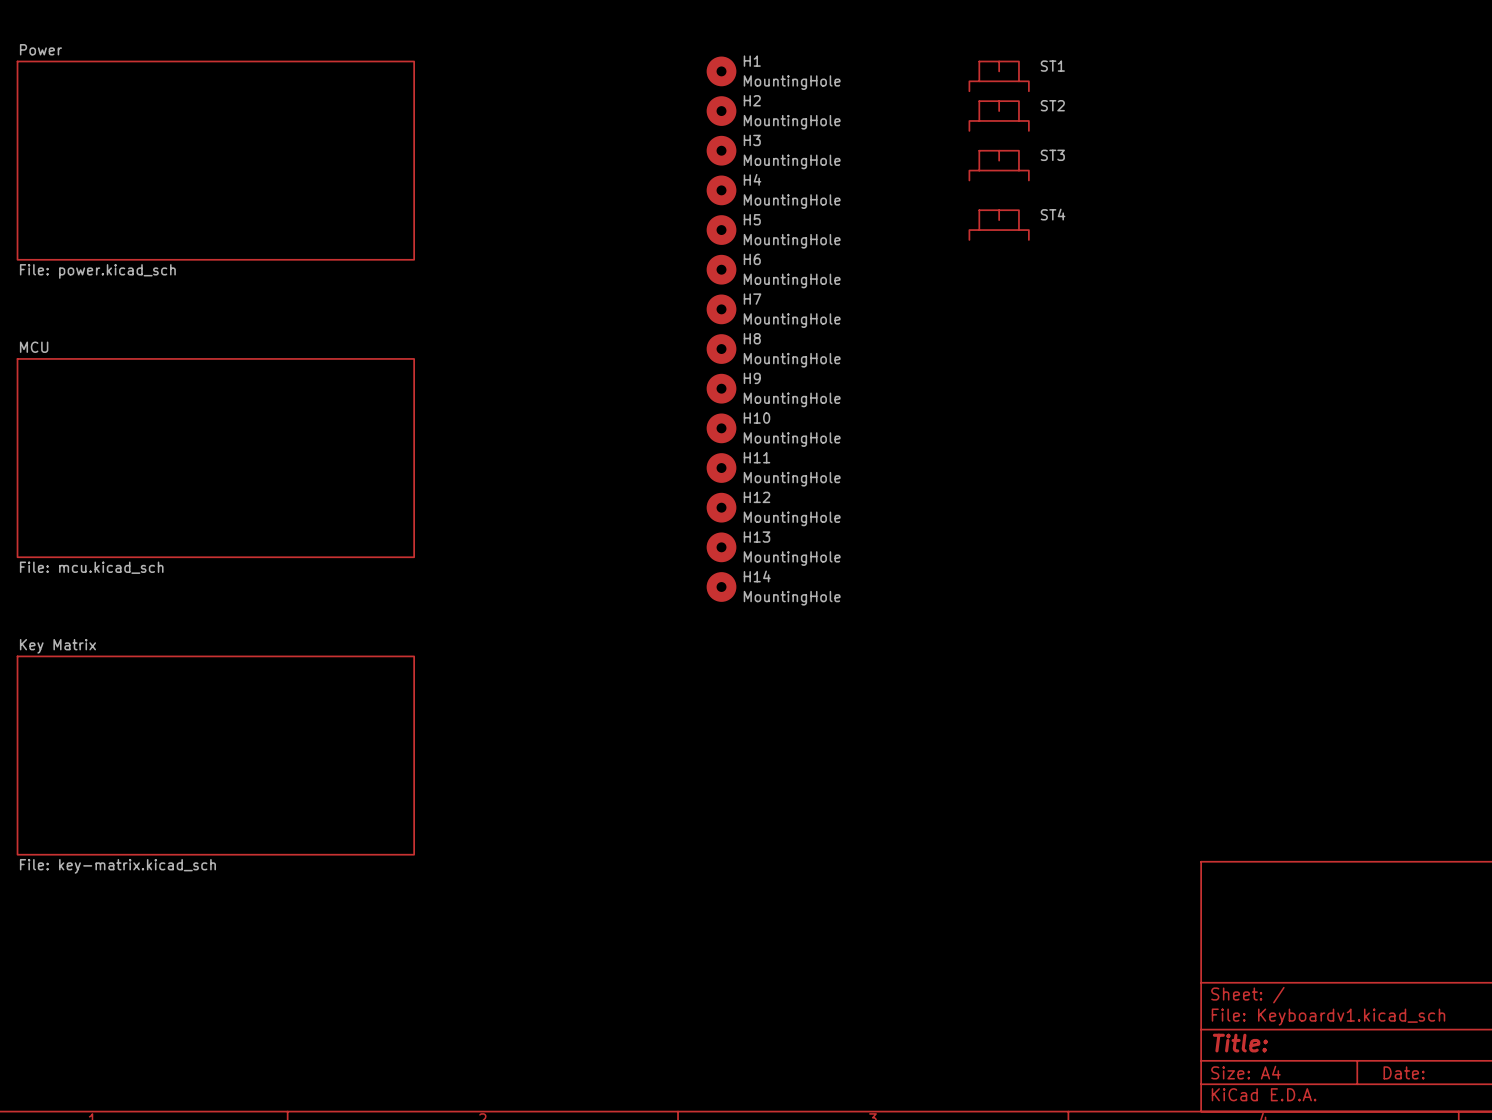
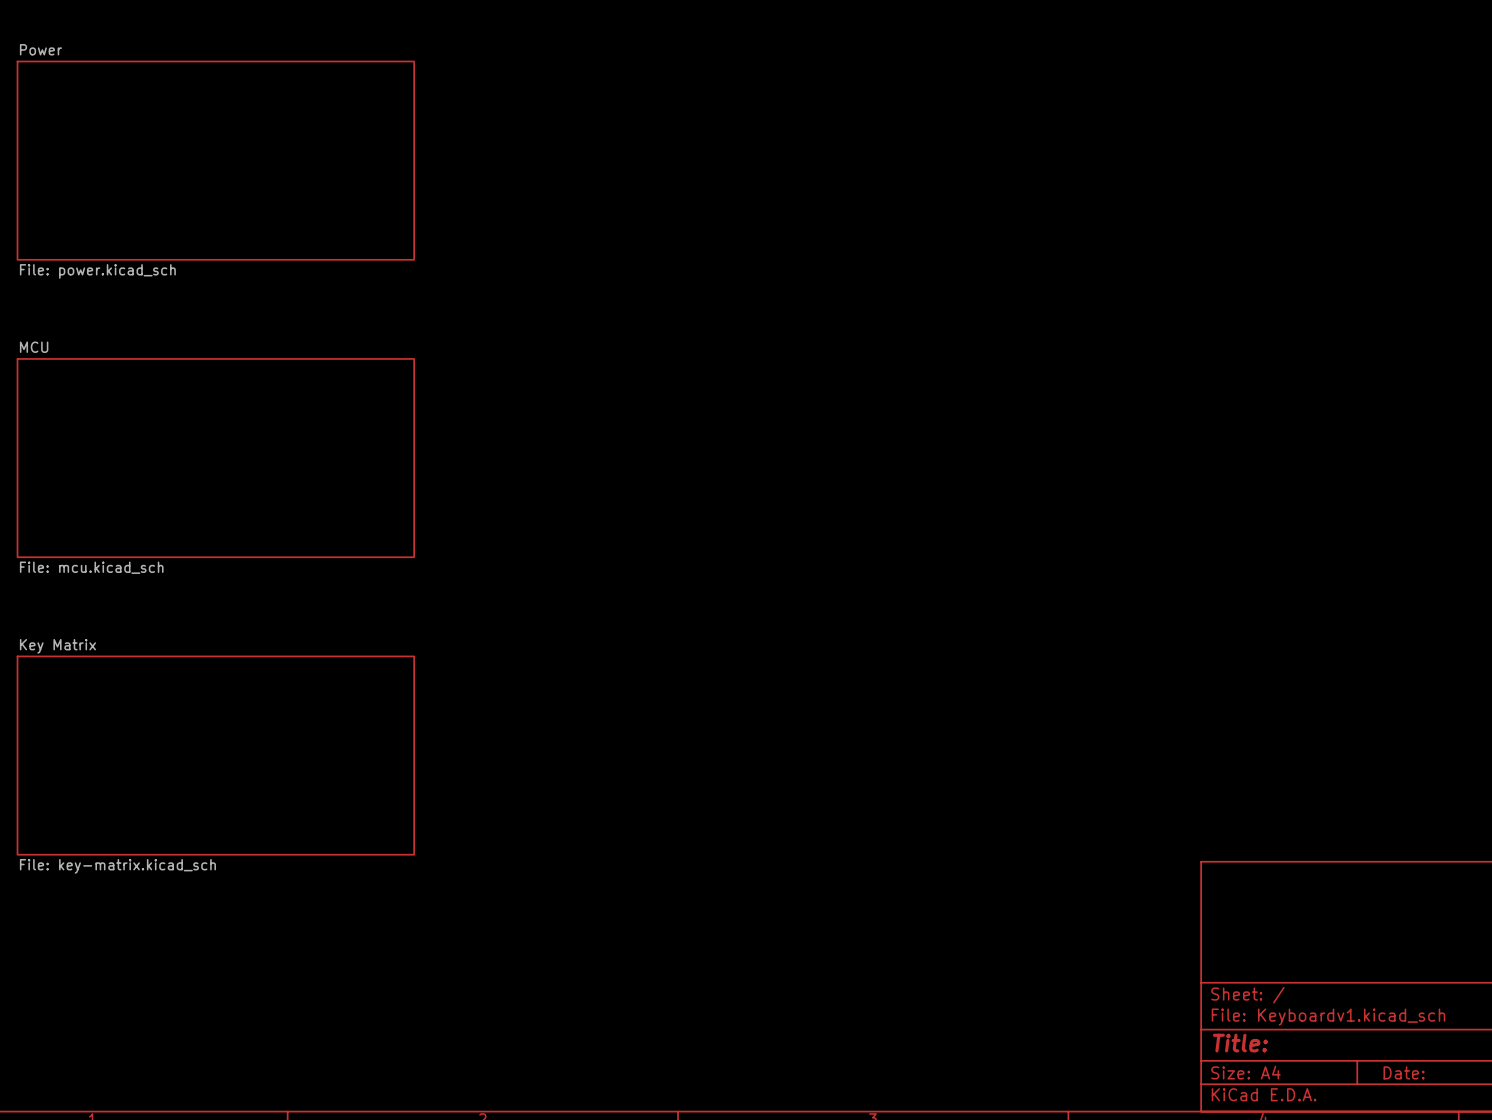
H1: MountingHole (721, 71) -> none
ST1: (999, 76) -> none
H2: MountingHole (721, 111) -> none
ST2: (999, 116) -> none
H3: MountingHole (721, 150) -> none
ST3: (999, 165) -> none
H4: MountingHole (721, 190) -> none
ST4: (999, 225) -> none
H5: MountingHole (721, 230) -> none
H6: MountingHole (721, 269) -> none
H7: MountingHole (721, 309) -> none
H8: MountingHole (721, 349) -> none
H9: MountingHole (721, 388) -> none
H10: MountingHole (721, 428) -> none
H11: MountingHole (721, 468) -> none
H12: MountingHole (721, 507) -> none
H13: MountingHole (721, 547) -> none
H14: MountingHole (721, 587) -> none

